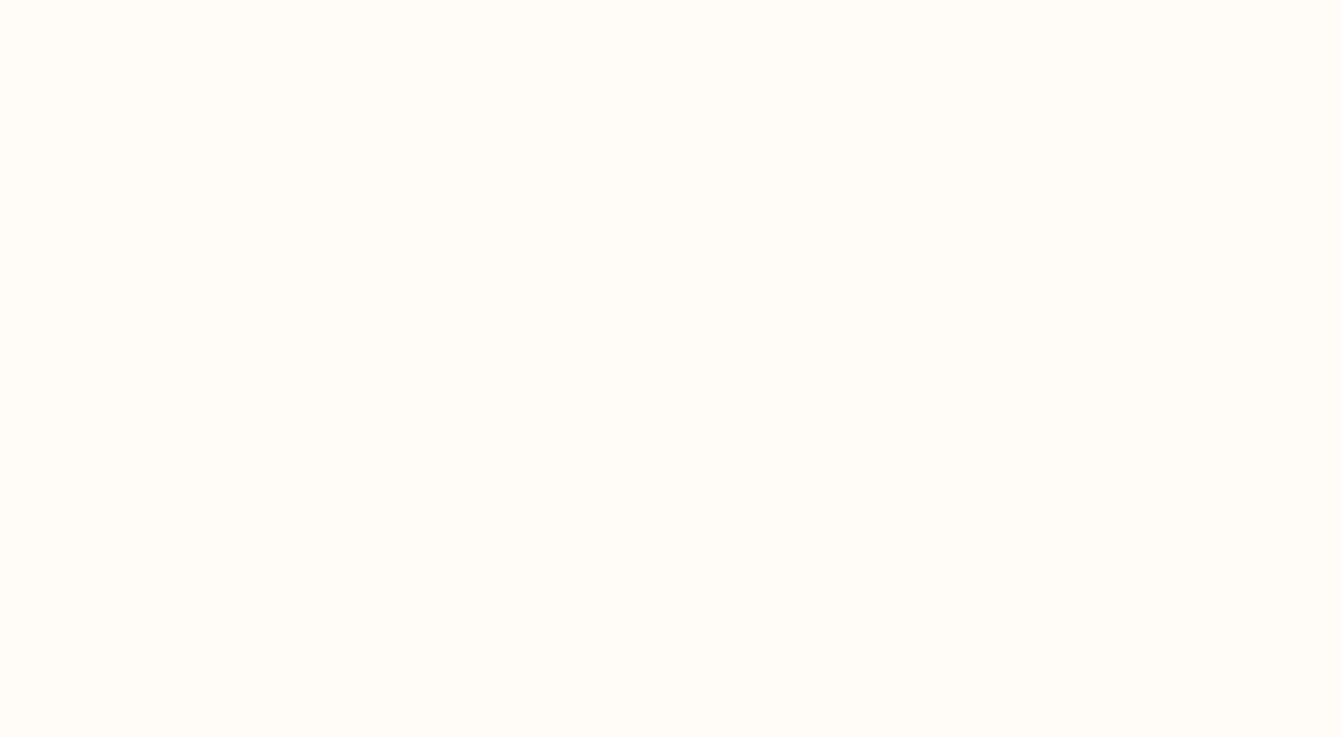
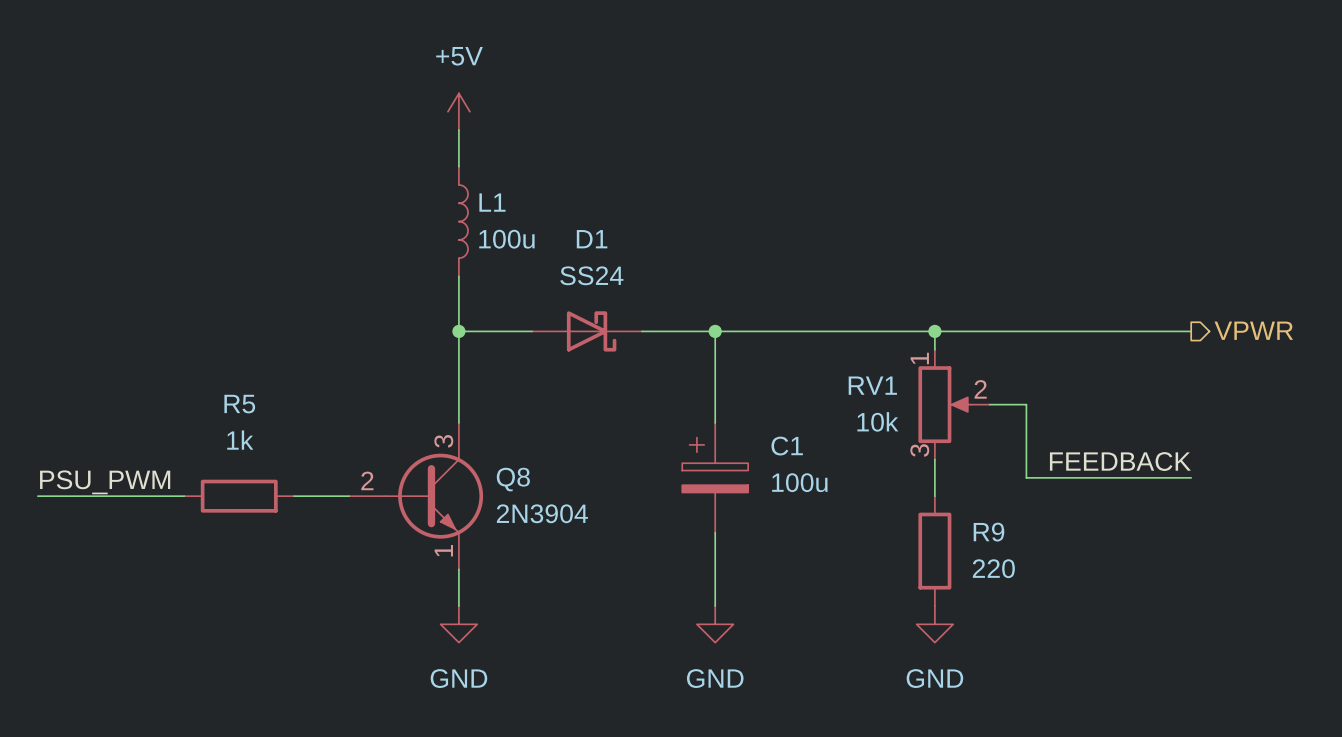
power symbol: none -> +5V (458, 111)
wire: none -> (458, 130) (458, 166)
L1: none -> 100u (463, 221)
wire: none -> (458, 276) (458, 422)
hierarchical label: none -> VPWR (1253, 330)
wire: none -> (458, 331) (532, 331)
junction: none -> (458, 331)
D1: none -> SS24 (587, 331)
wire: none -> (641, 331) (1191, 331)
wire: none -> (715, 331) (715, 422)
junction: none -> (715, 331)
wire: none -> (934, 331) (934, 349)
junction: none -> (934, 331)
RV1: none -> 10k (954, 404)
wire: none -> (989, 404) (1026, 404) (1026, 477) (1191, 477)
wire: none -> (934, 459) (934, 496)
label: none -> FEEDBACK (1120, 461)
C1: none -> 100u (715, 477)
label: none -> PSU_PWM (105, 482)
wire: none -> (37, 496) (184, 496)
R5: none -> 1k (239, 496)
wire: none -> (294, 496) (349, 496)
Q8: none -> 2N3904 (416, 496)
wire: none -> (715, 532) (715, 606)
R9: none -> 220 (934, 551)
wire: none -> (458, 569) (458, 606)
power symbol: none -> GND (458, 624)
power symbol: none -> GND (715, 624)
power symbol: none -> GND (934, 624)

